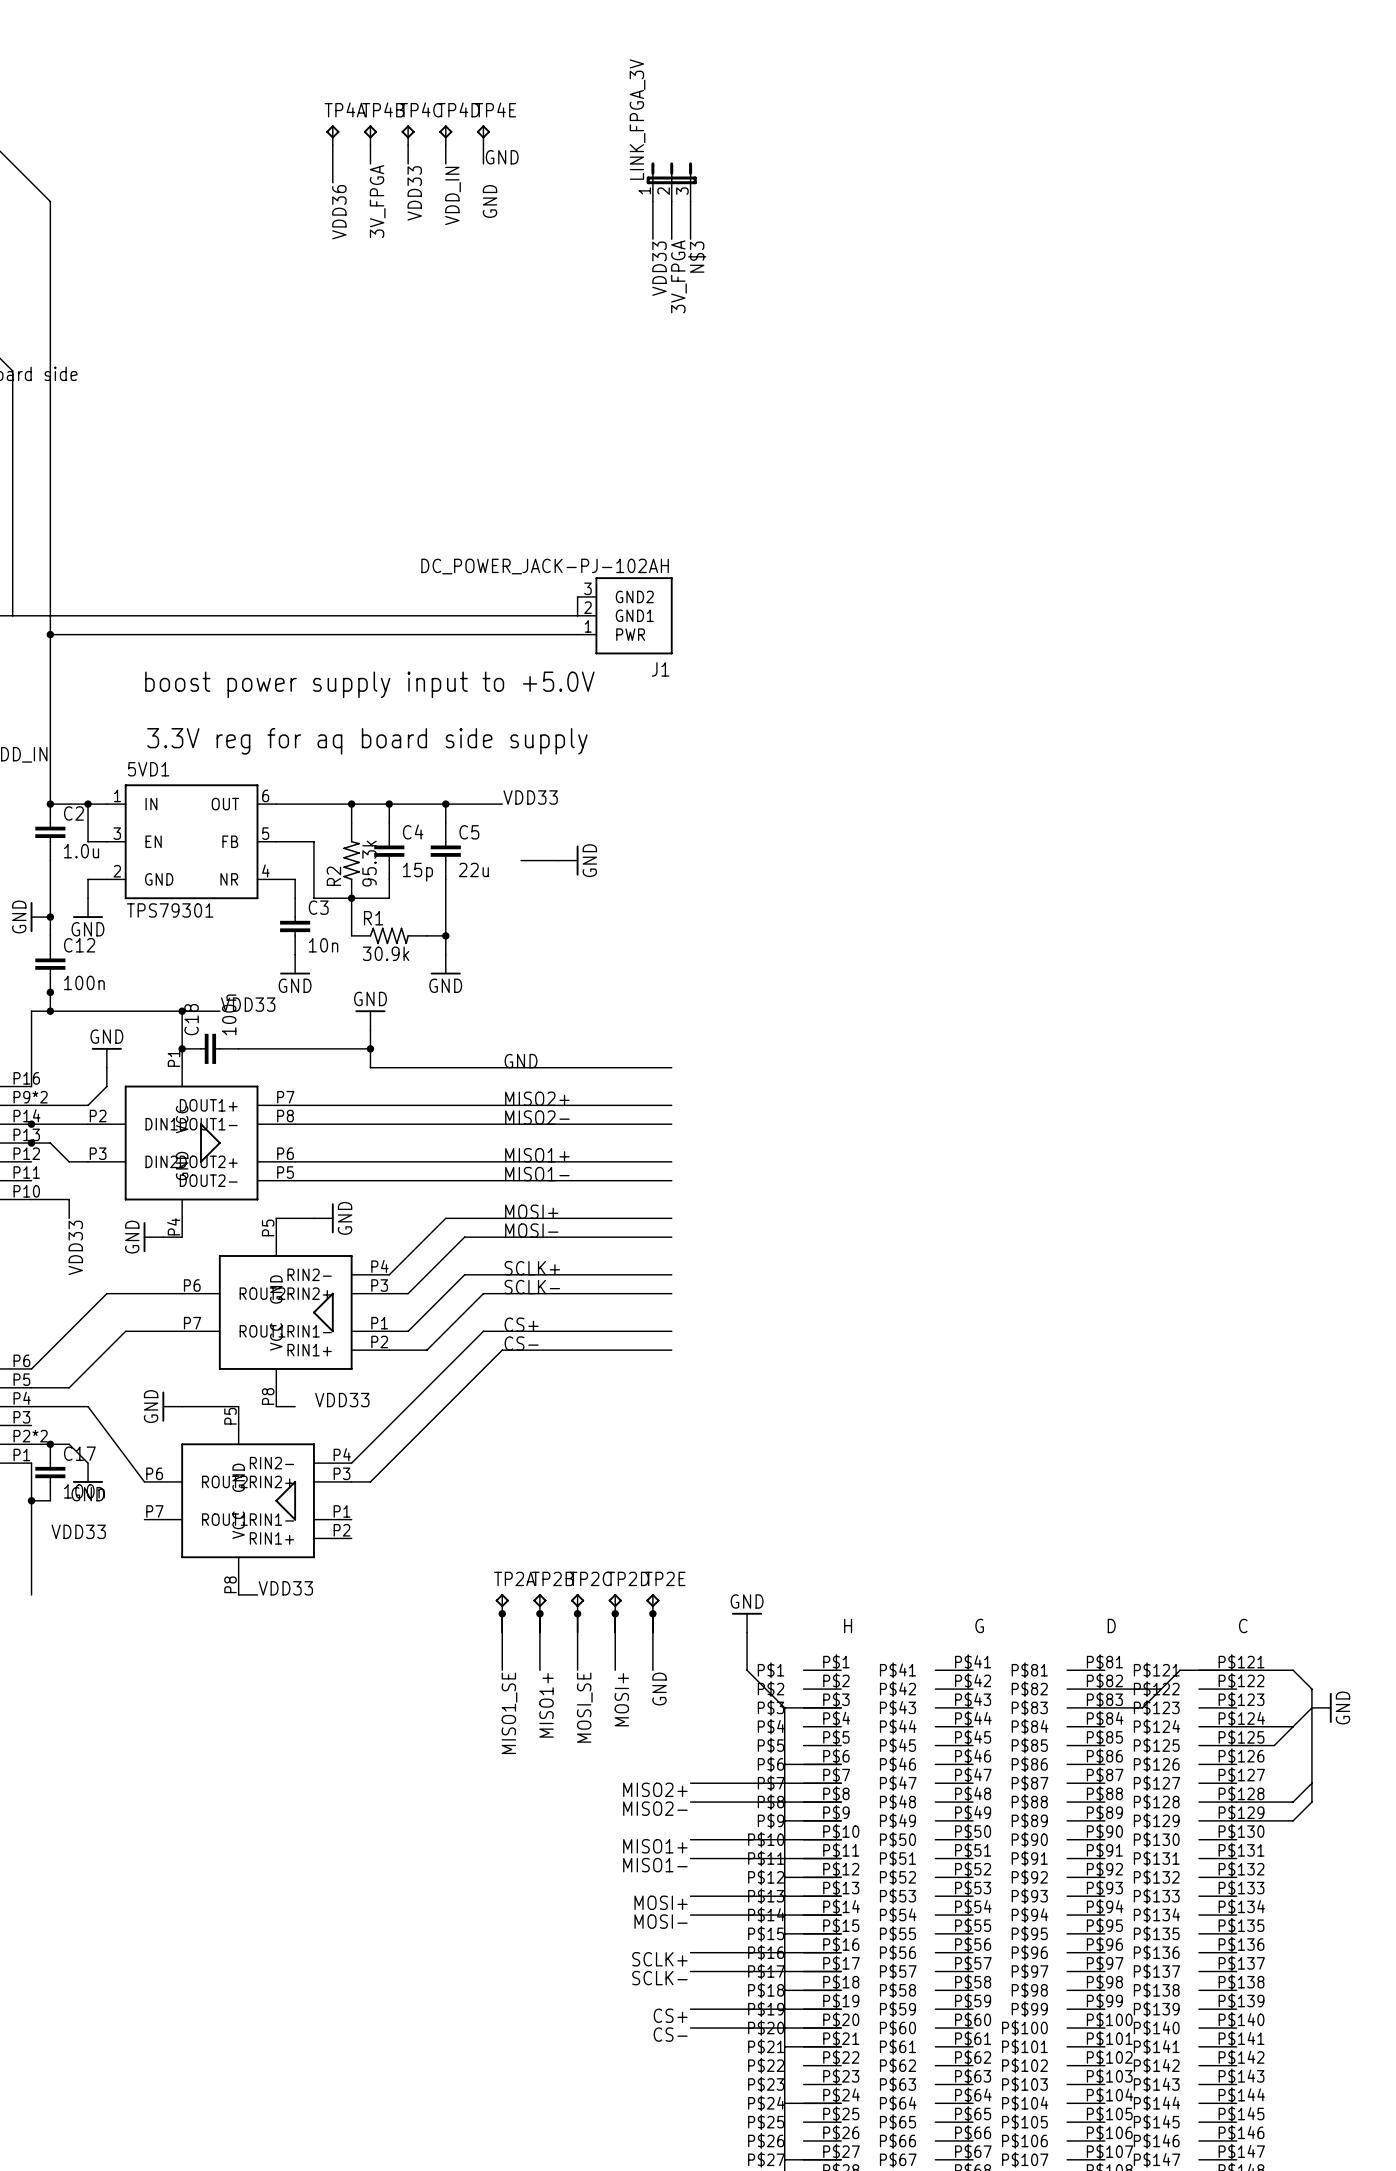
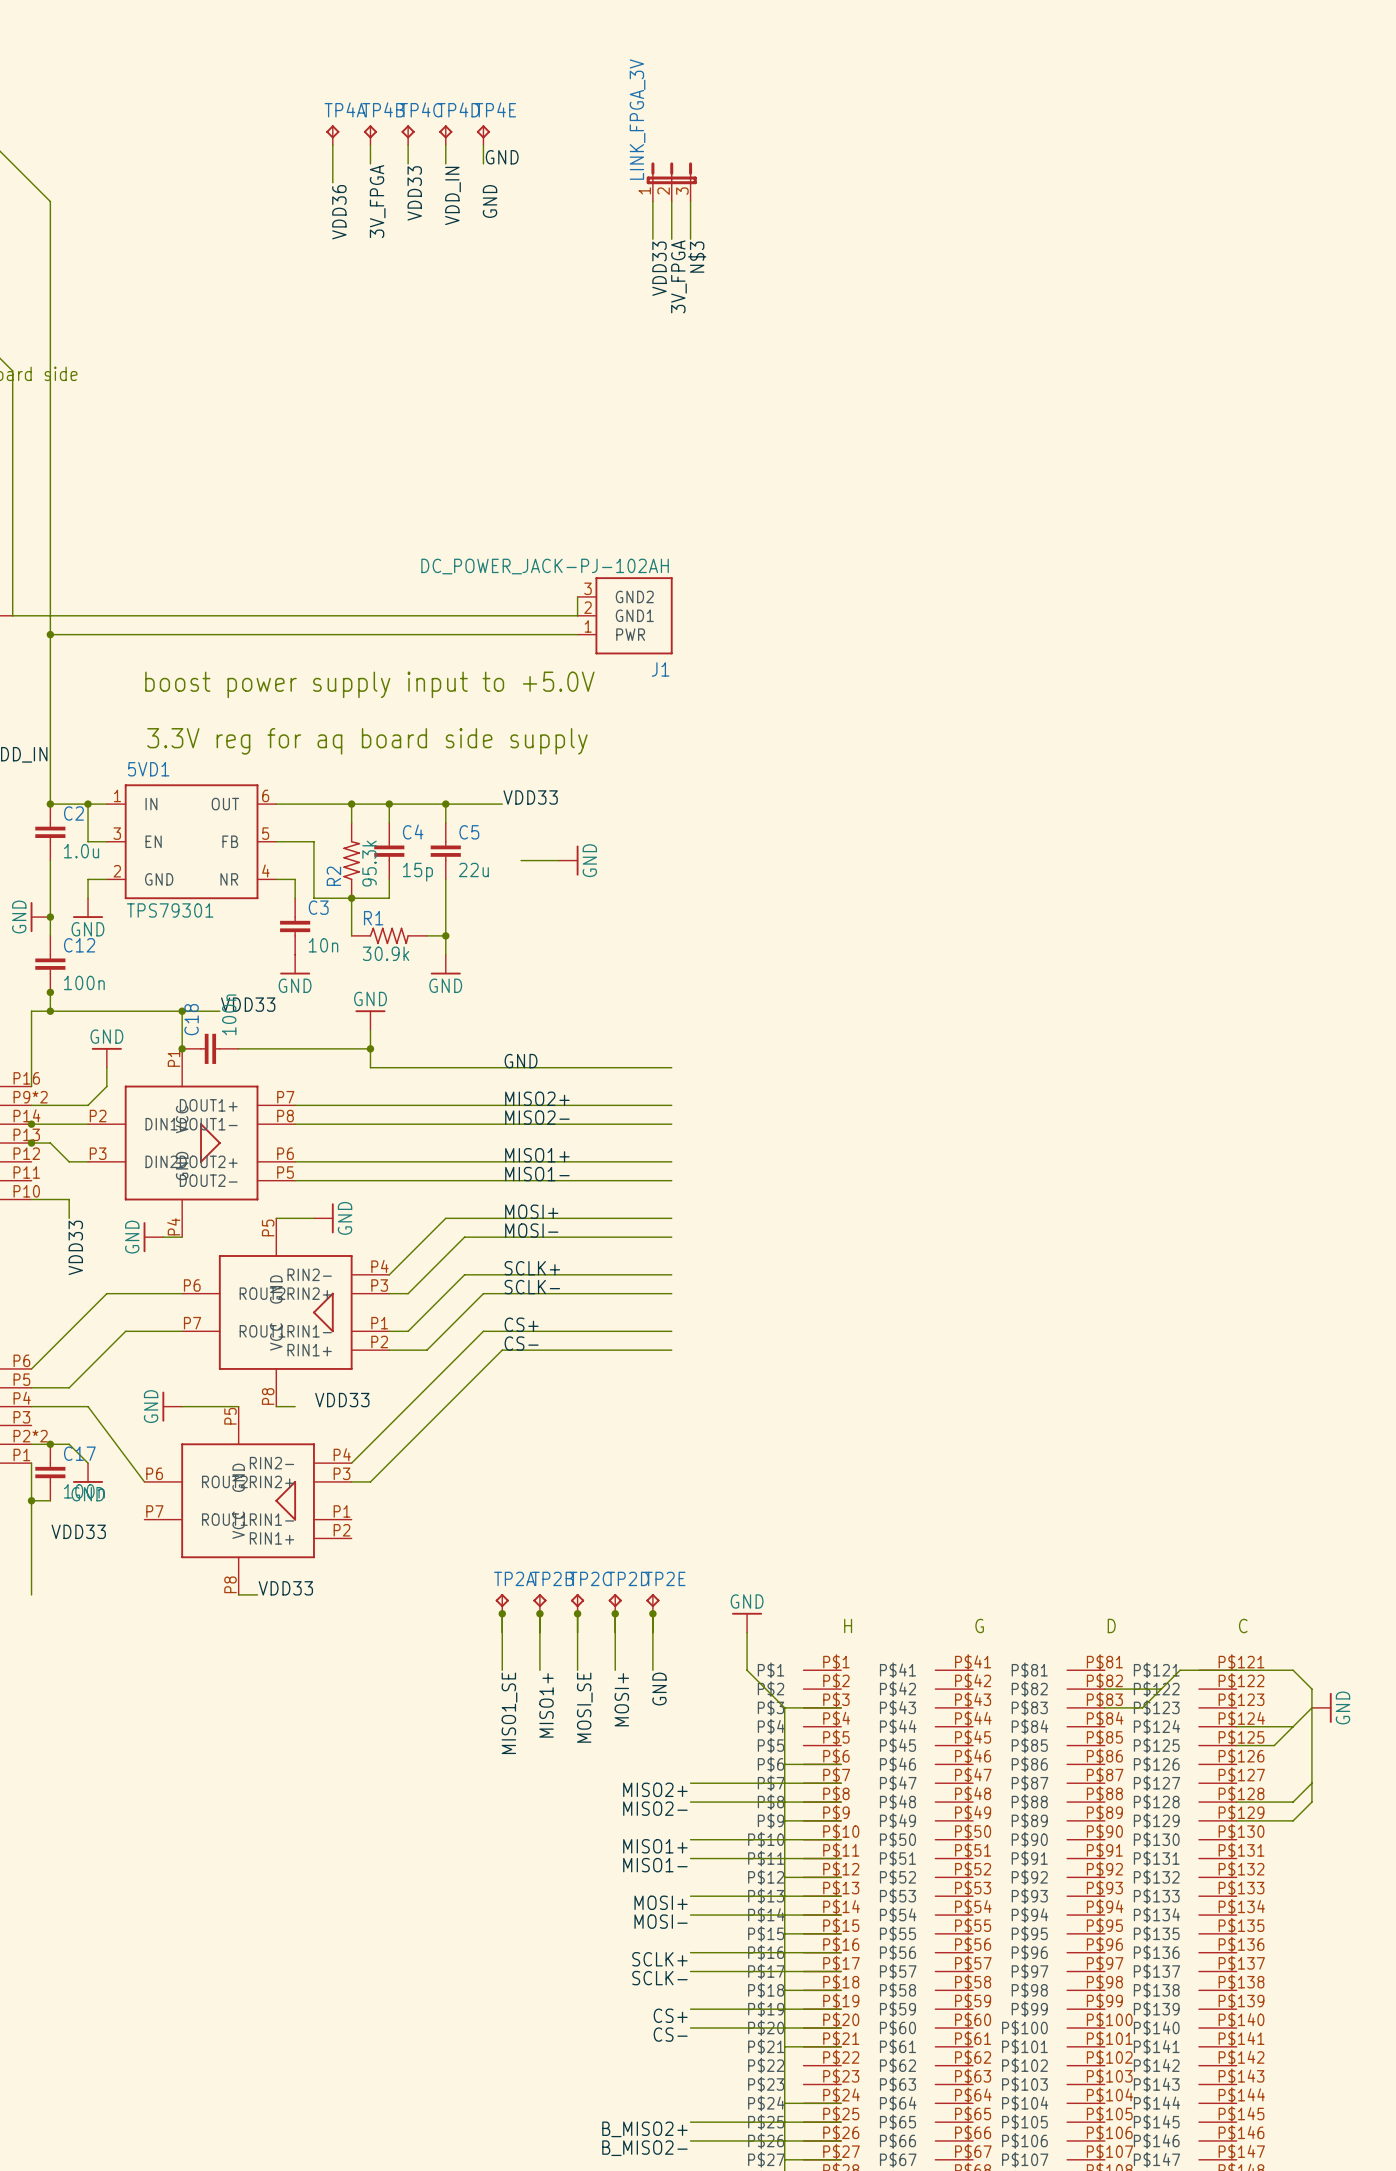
wire: none -> (690, 2122) (841, 2122)
label: none -> B_MISO2+ (644, 2129)
wire: none -> (690, 2140) (841, 2140)
label: none -> B_MISO2- (644, 2148)

